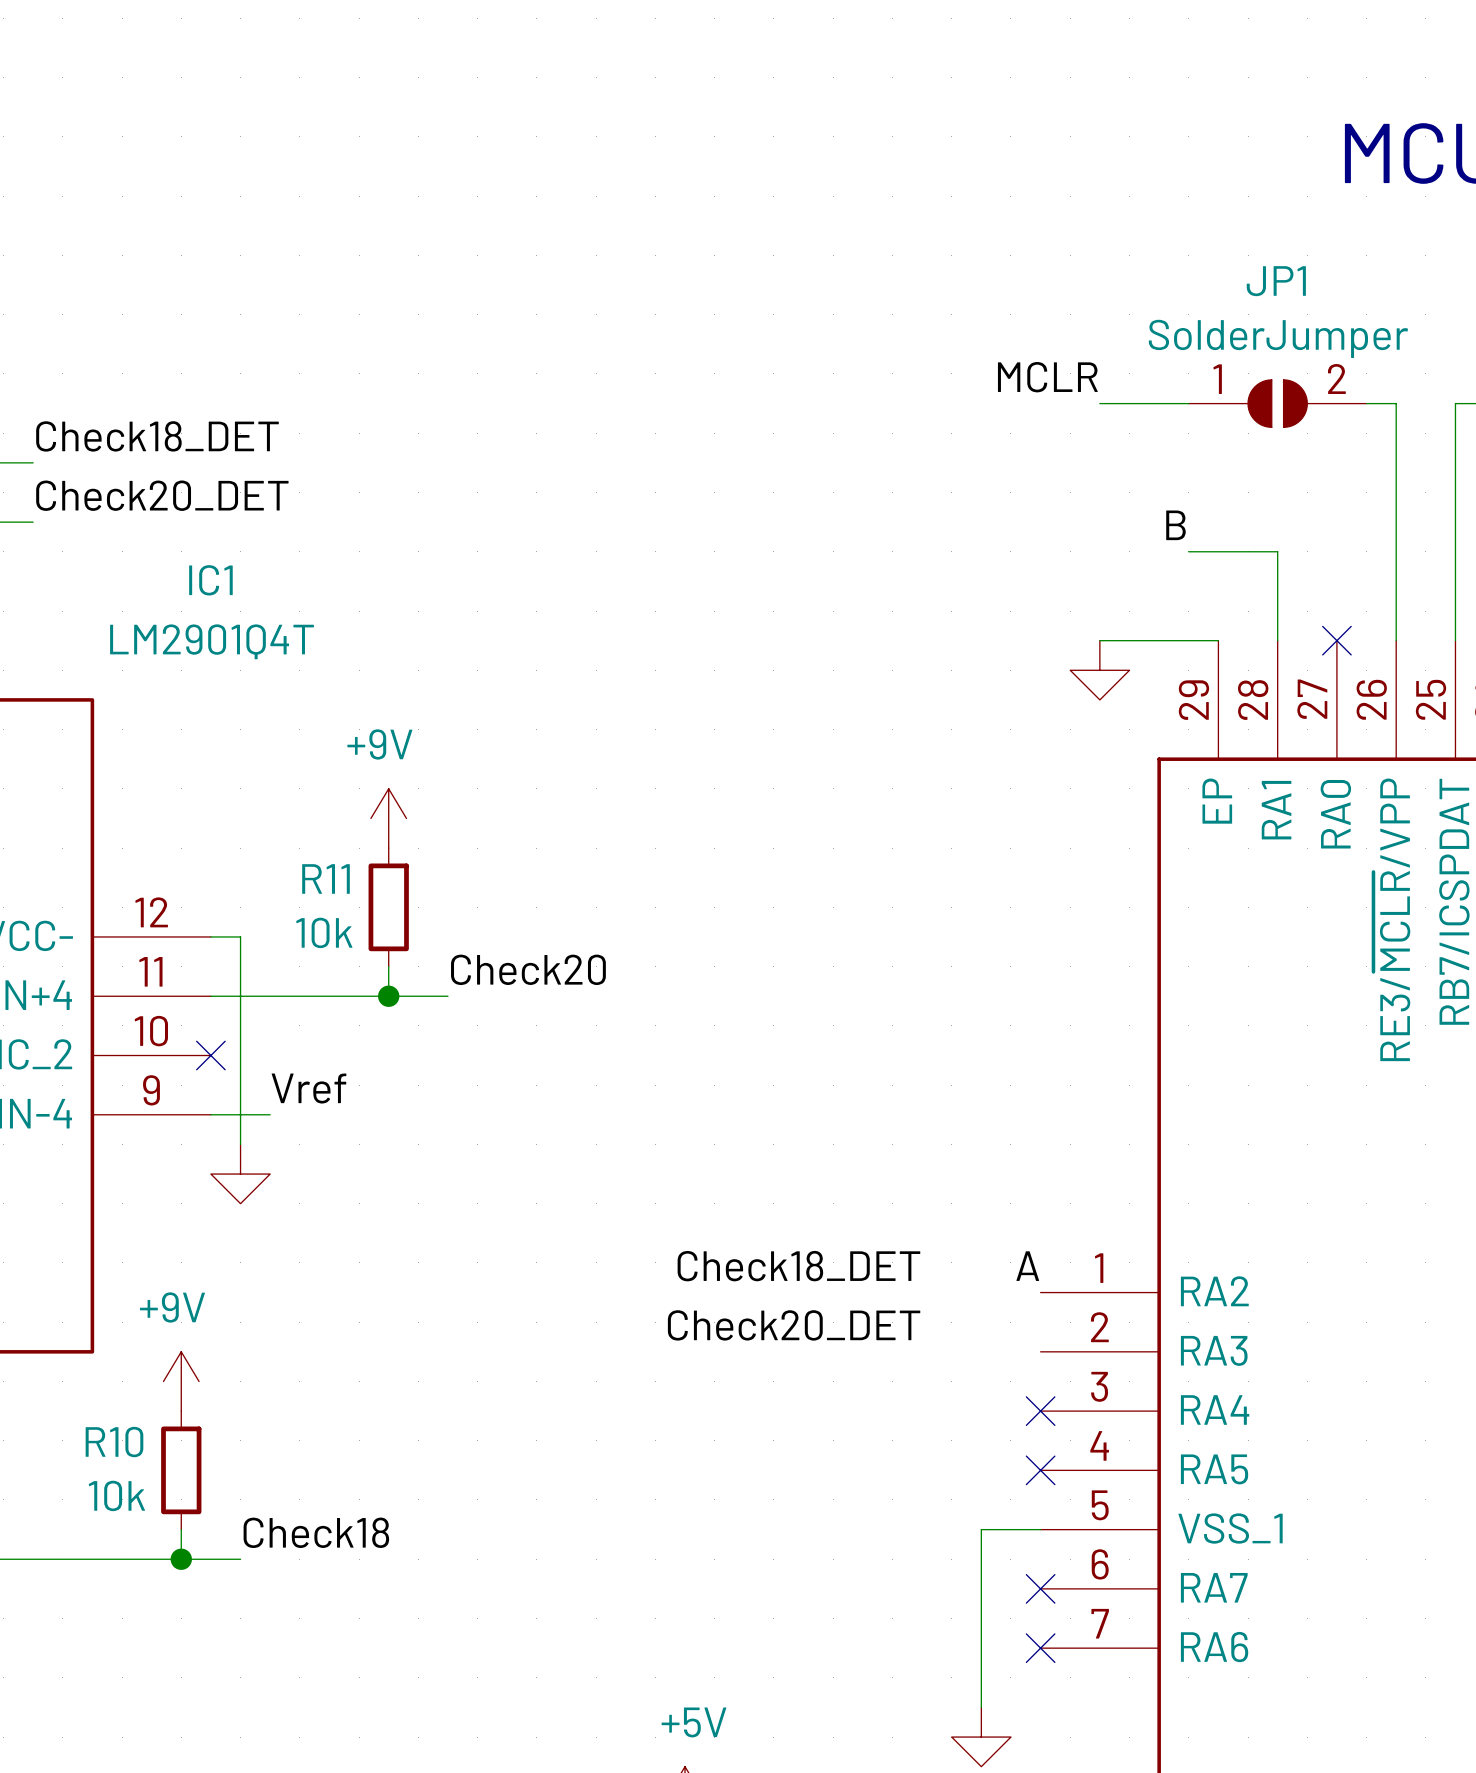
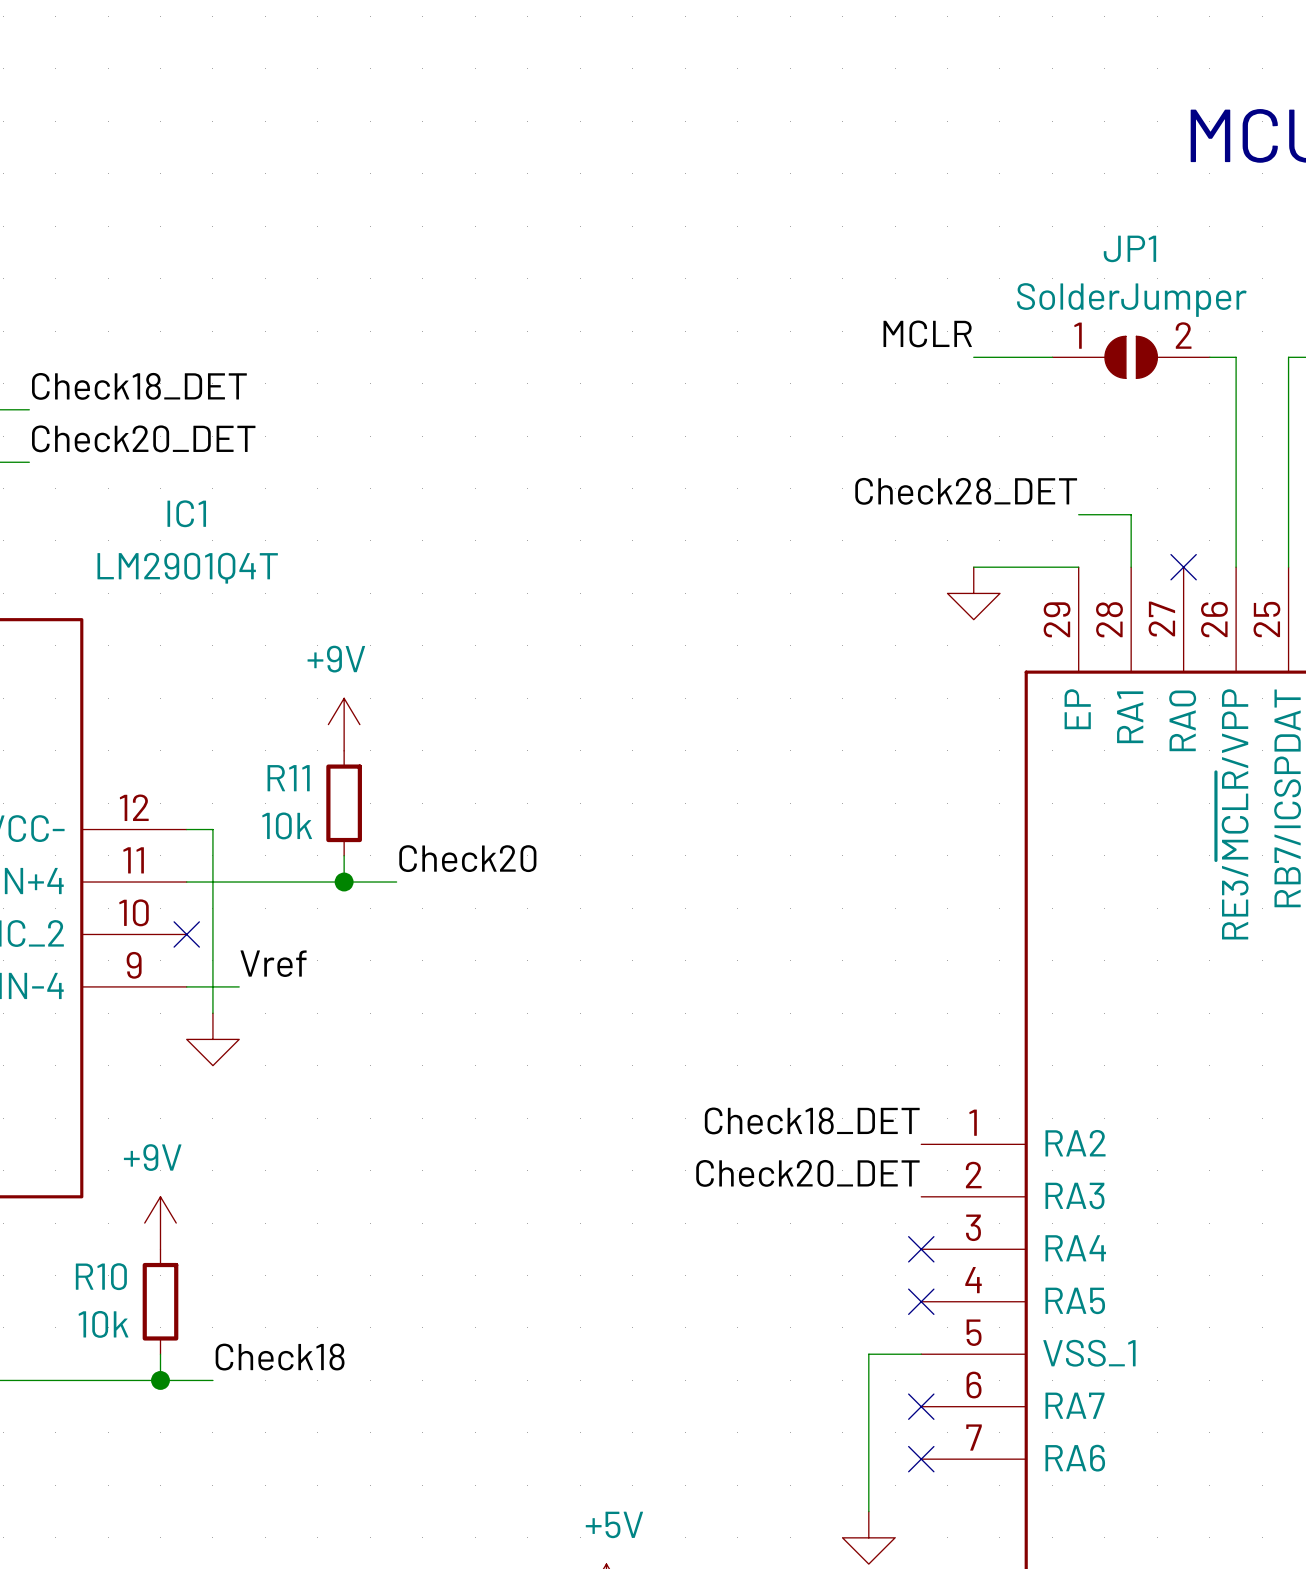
label: B (1175, 525) -> none
wire: (1188, 551) (1277, 551) (1277, 581) -> (1078, 514) (1131, 514)
label: none -> Check28_DET (966, 491)
label: Check18_DET (798, 1266) -> none
label: A (1027, 1266) -> Check18_DET (812, 1120)
label position: Check20_DET (794, 1325) -> Check20_DET (807, 1173)

